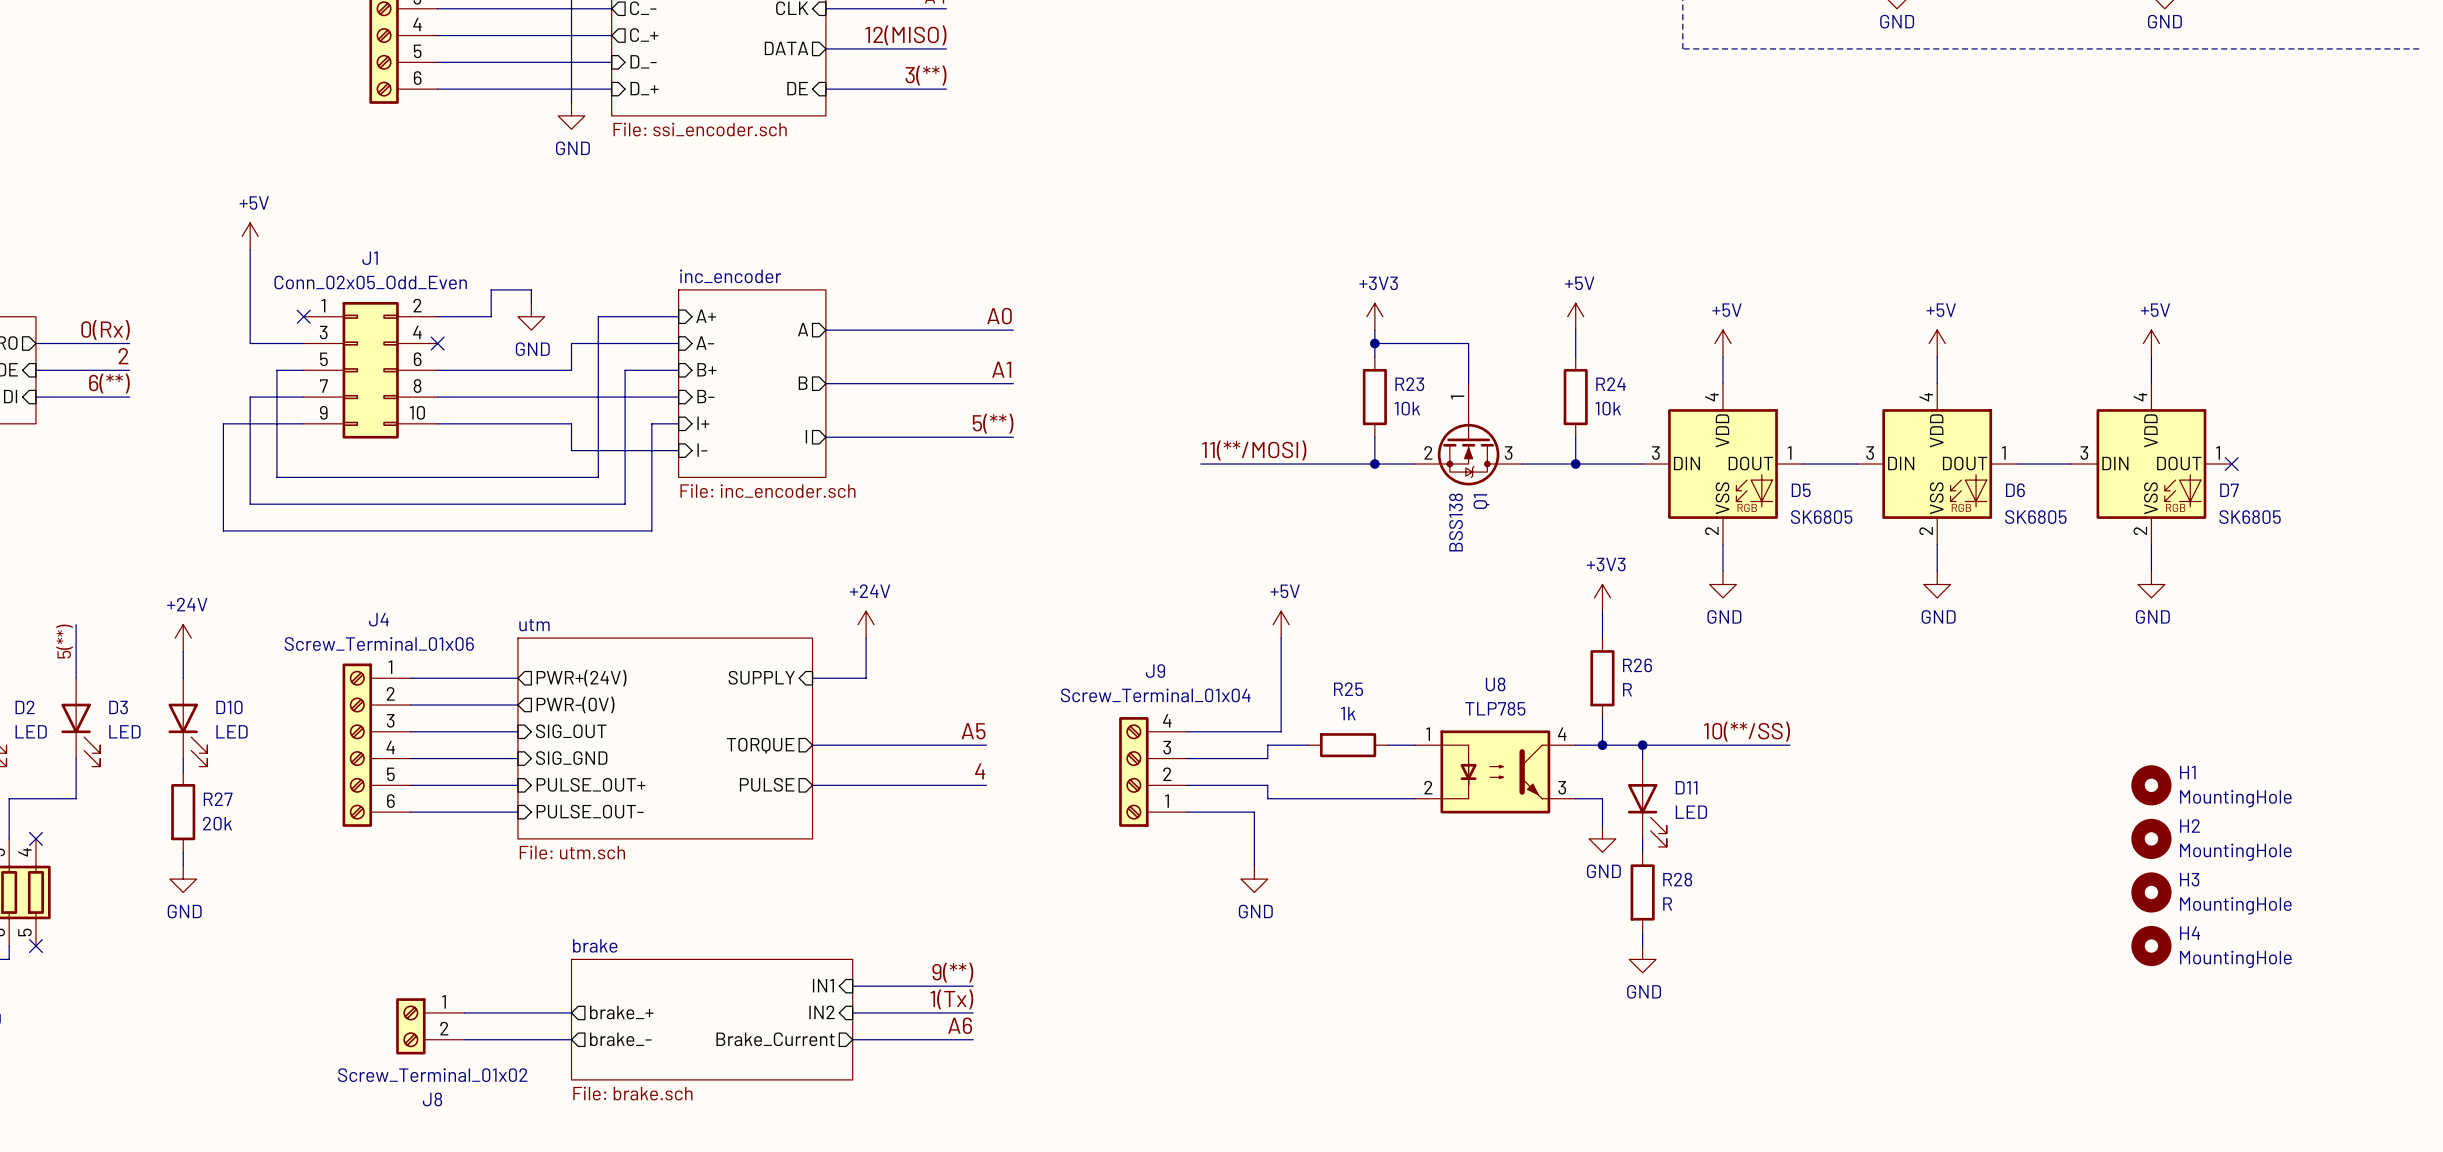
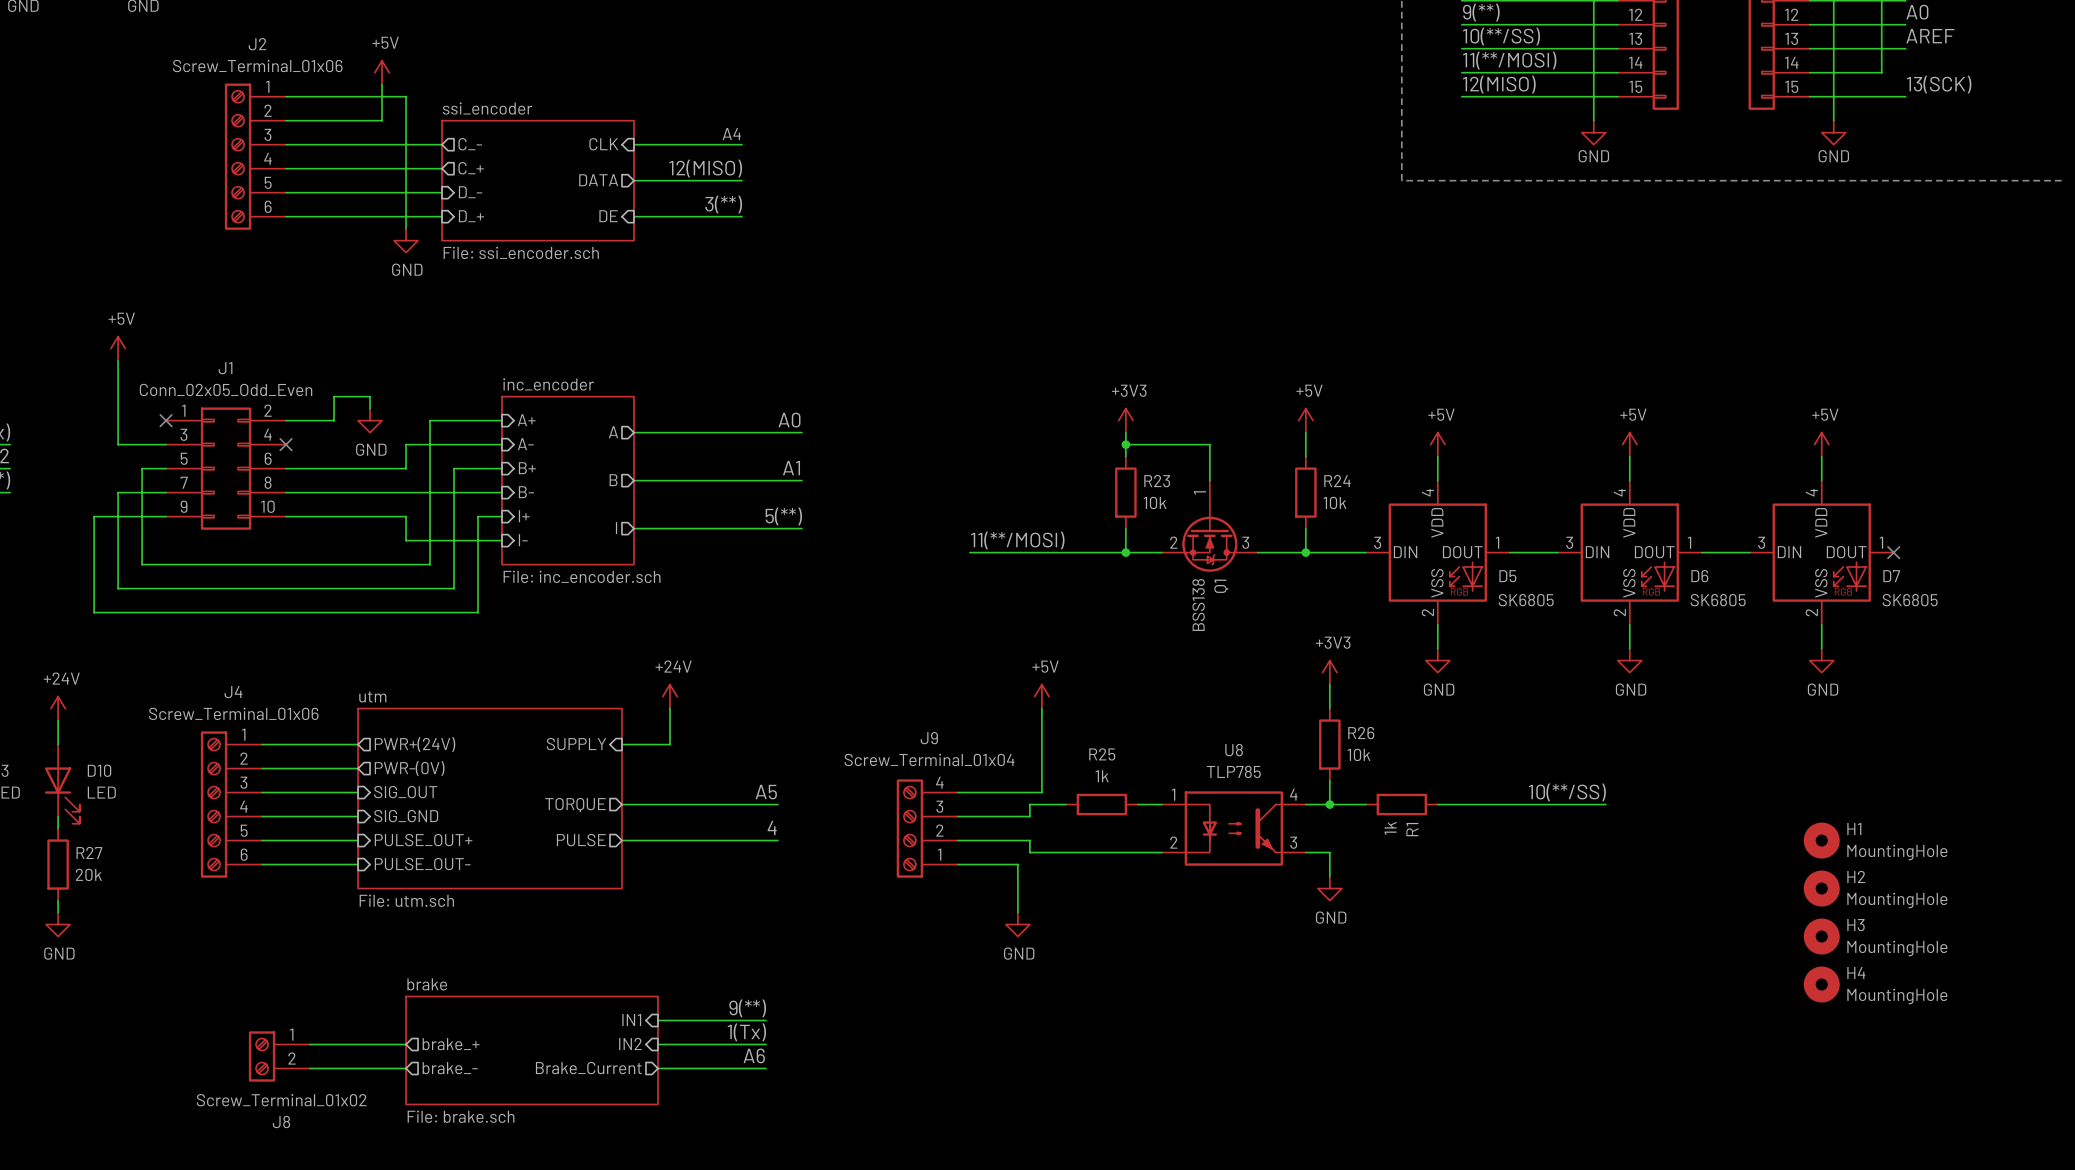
R26 value: R (1627, 689) -> 10k (1359, 754)
label position: 10(**/SS) (1747, 731) -> 10(**/SS) (1567, 792)
junction: (1642, 745) -> none
R1: none -> 1k (1401, 804)
wire: (1722, 745) (1642, 745) (1642, 758) -> none
wire: none -> (1497, 804) (1605, 804)
D11: LED (1647, 802) -> none
wire: (1642, 838) (1642, 852) -> none
R28: R (1642, 892) -> none
wire: (1642, 932) (1642, 946) -> none
power symbol: GND (1642, 959) -> none

